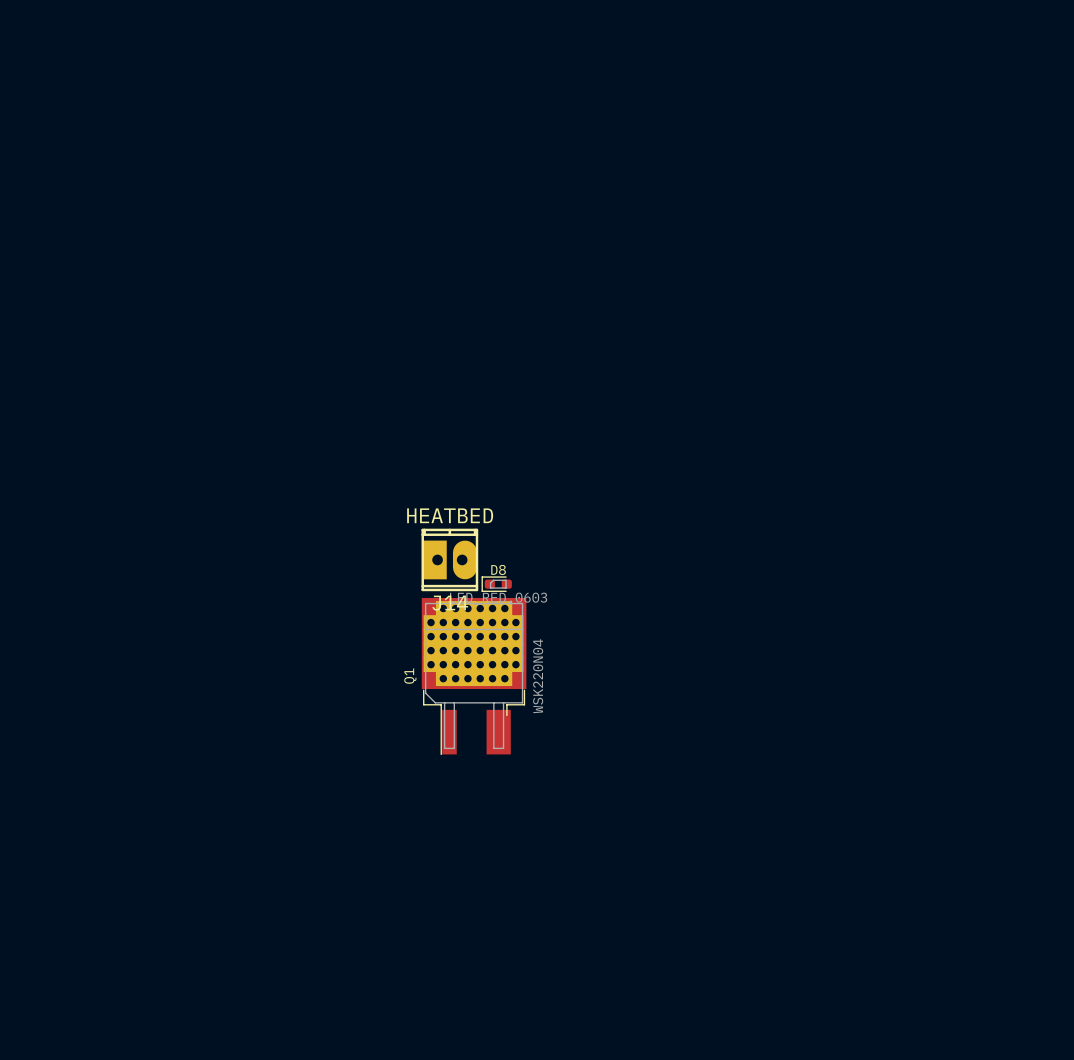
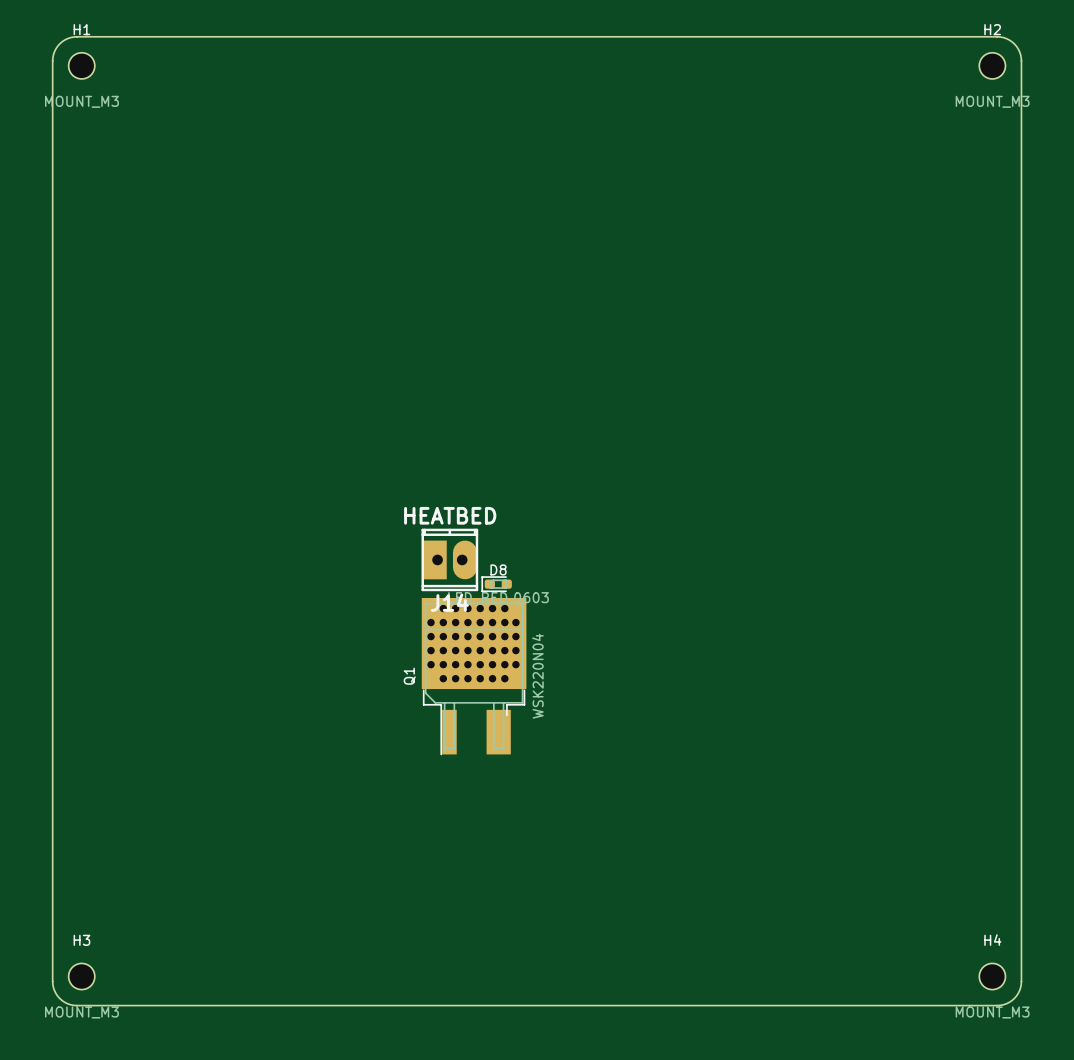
board edge: none -> (76, 36) (997, 36) (1006, 38) (1014, 43) (1019, 51) (1021, 61) (1021, 981) (1019, 990) (1014, 998) (1006, 1003) (997, 1005) (76, 1005) (67, 1003) (59, 998) (54, 990) (52, 981) (52, 61) (54, 51) (59, 43) (67, 38) (76, 36)
H1: none -> MOUNT_M3 (81, 65)
H2: none -> MOUNT_M3 (992, 65)
H3: none -> MOUNT_M3 (81, 976)
H4: none -> MOUNT_M3 (992, 976)

